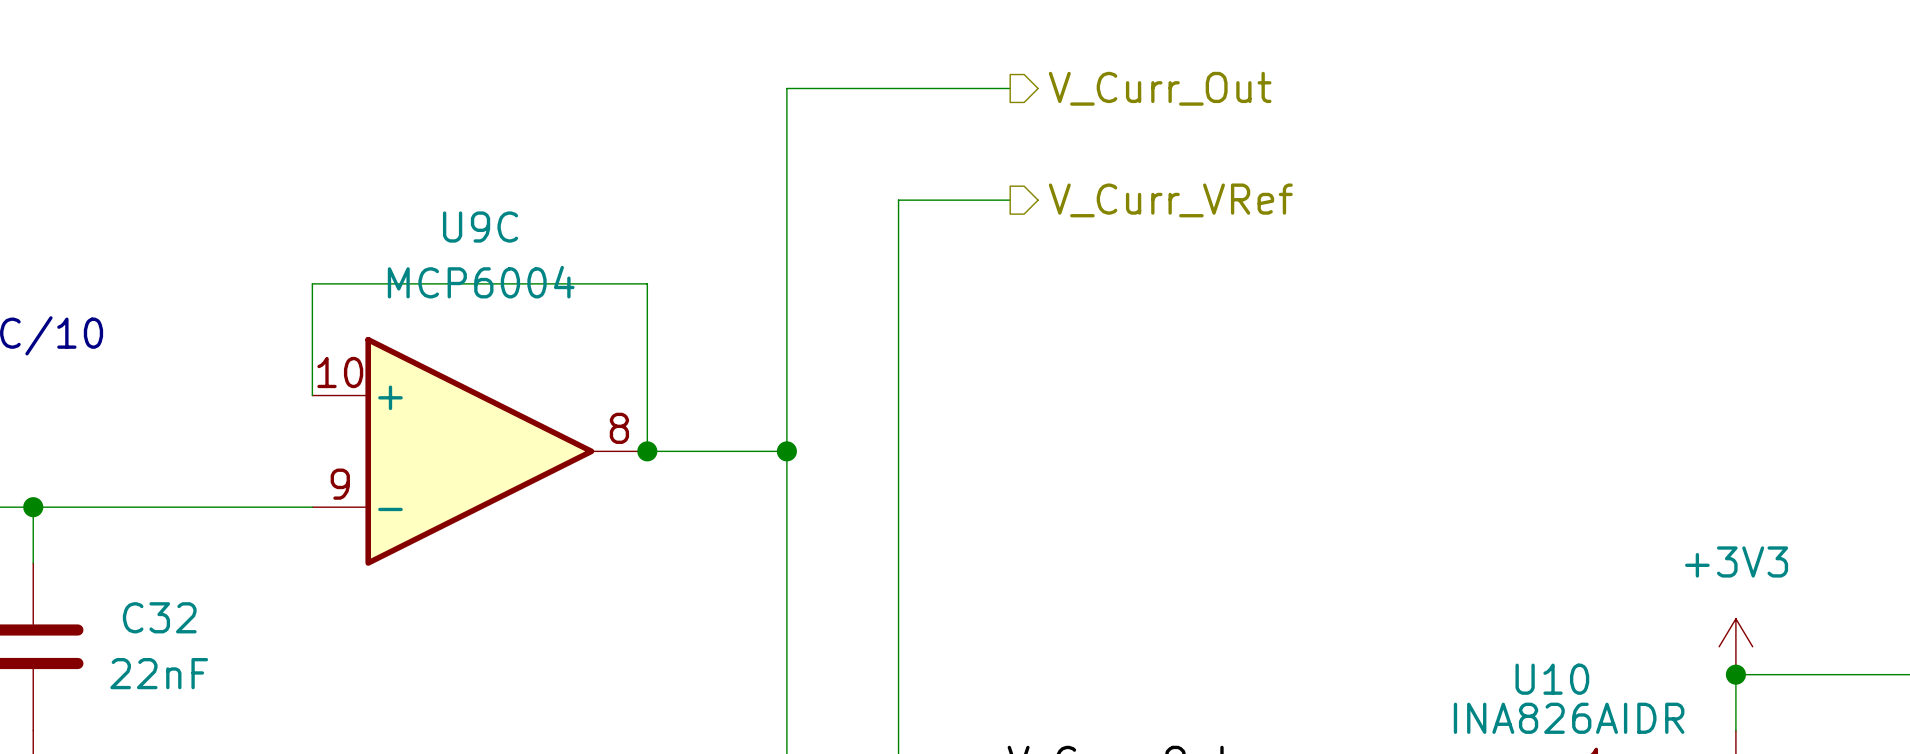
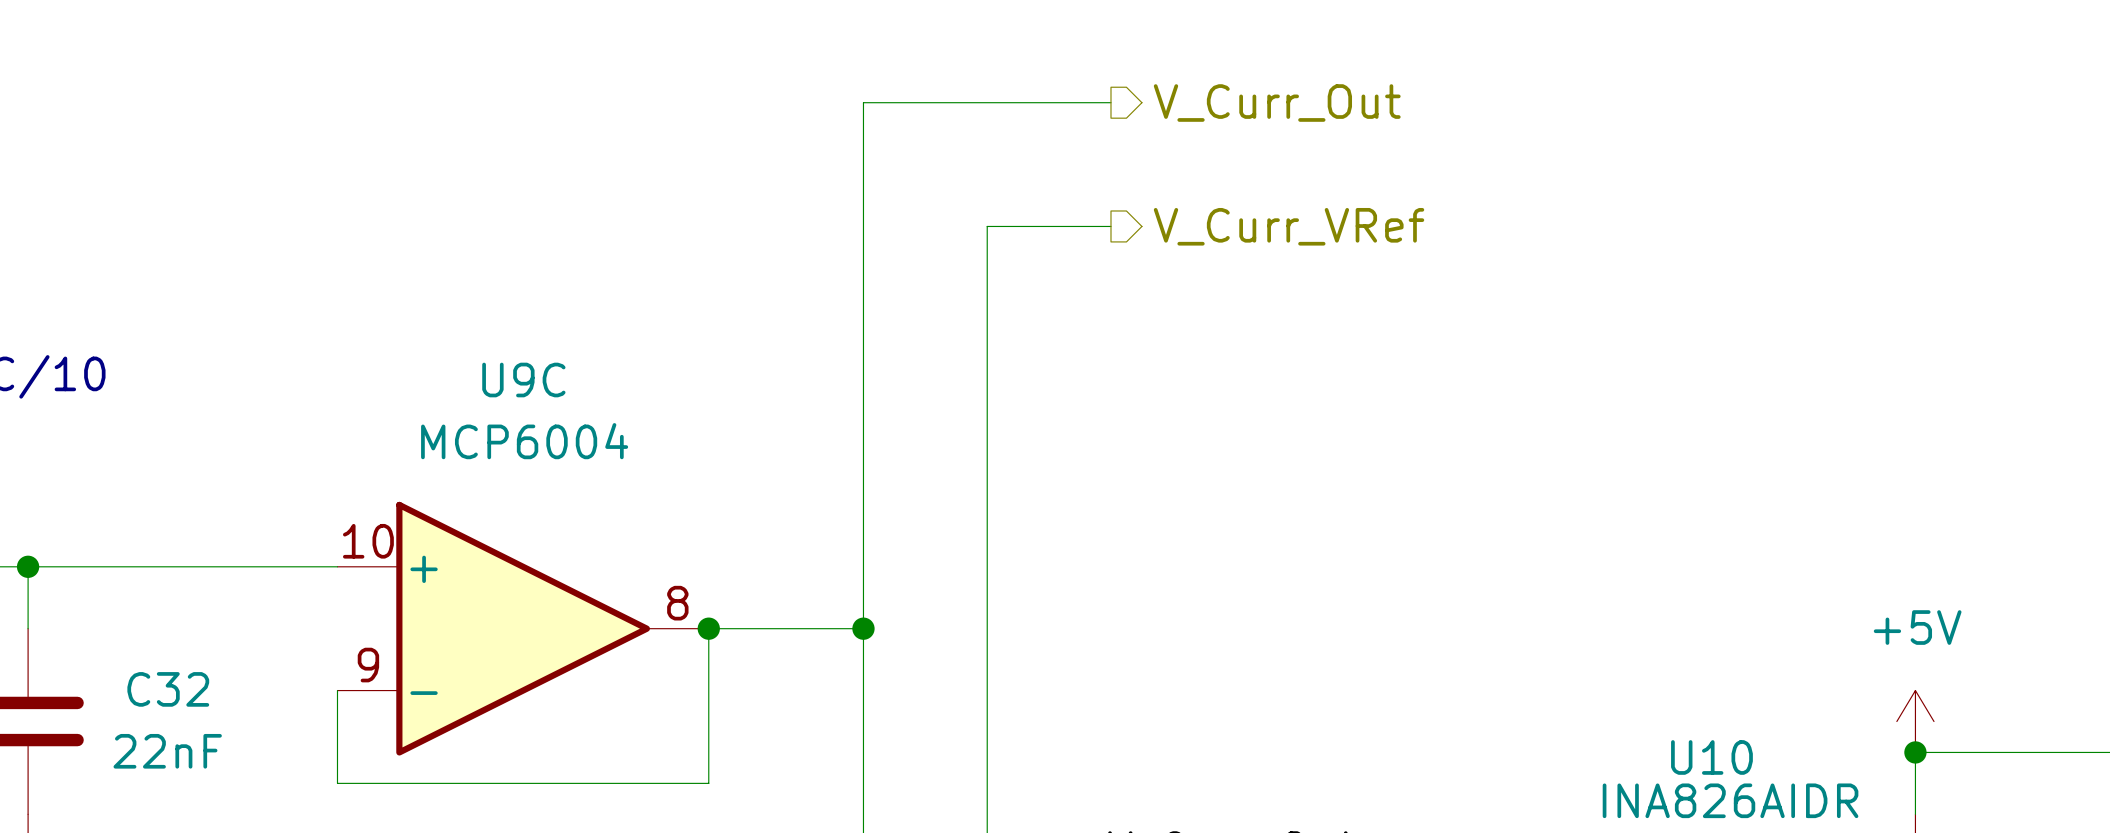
wire: (312, 395) (312, 283) (647, 283) (647, 451) (786, 451) -> none
U9C position: (479, 451) -> (523, 628)
junction: (647, 451) -> none
junction: (786, 451) -> none
junction: none -> (708, 628)
wire: none -> (863, 628) (708, 628) (708, 783) (337, 783) (337, 690)
junction: none -> (863, 628)
power symbol: +3V3 (1735, 646) -> +5V (1915, 721)

